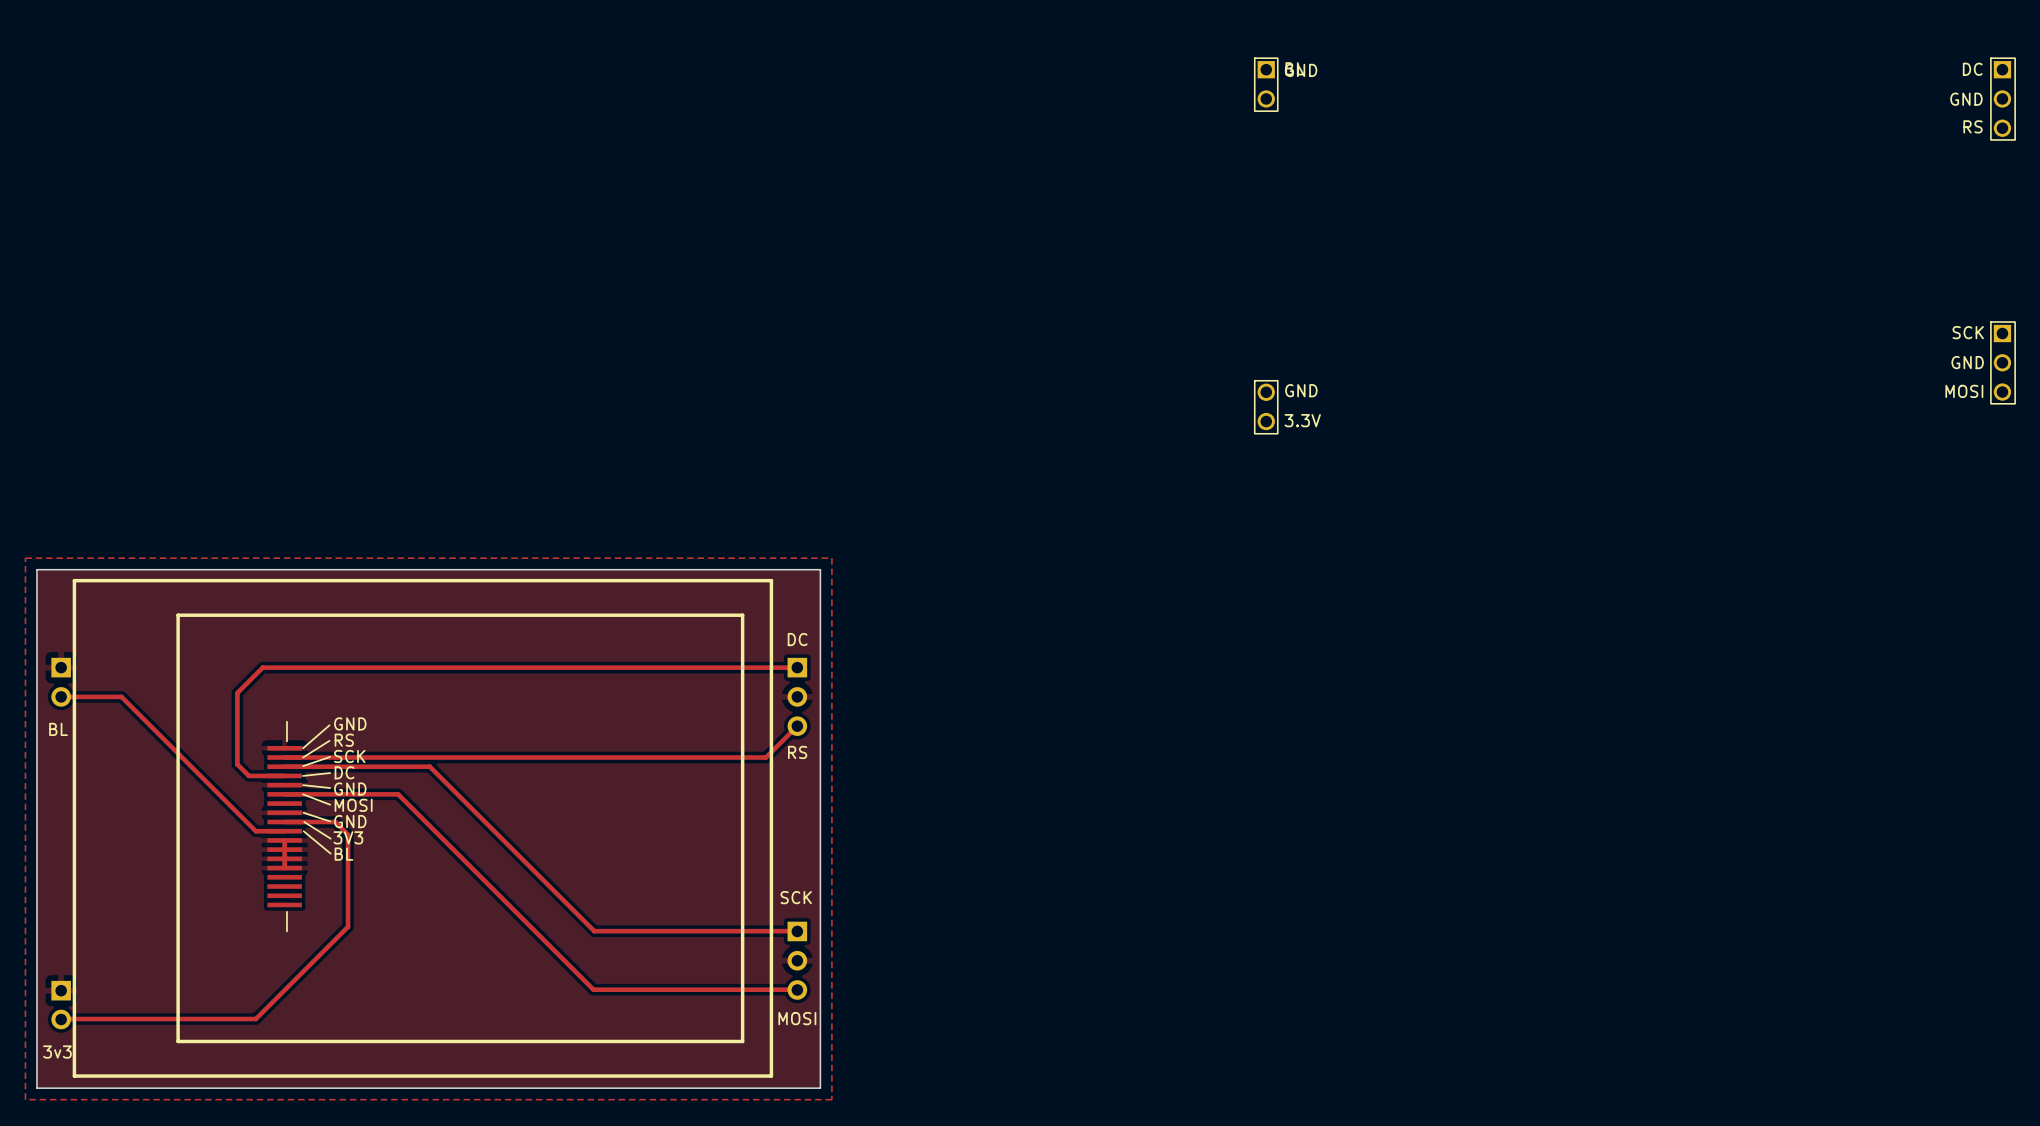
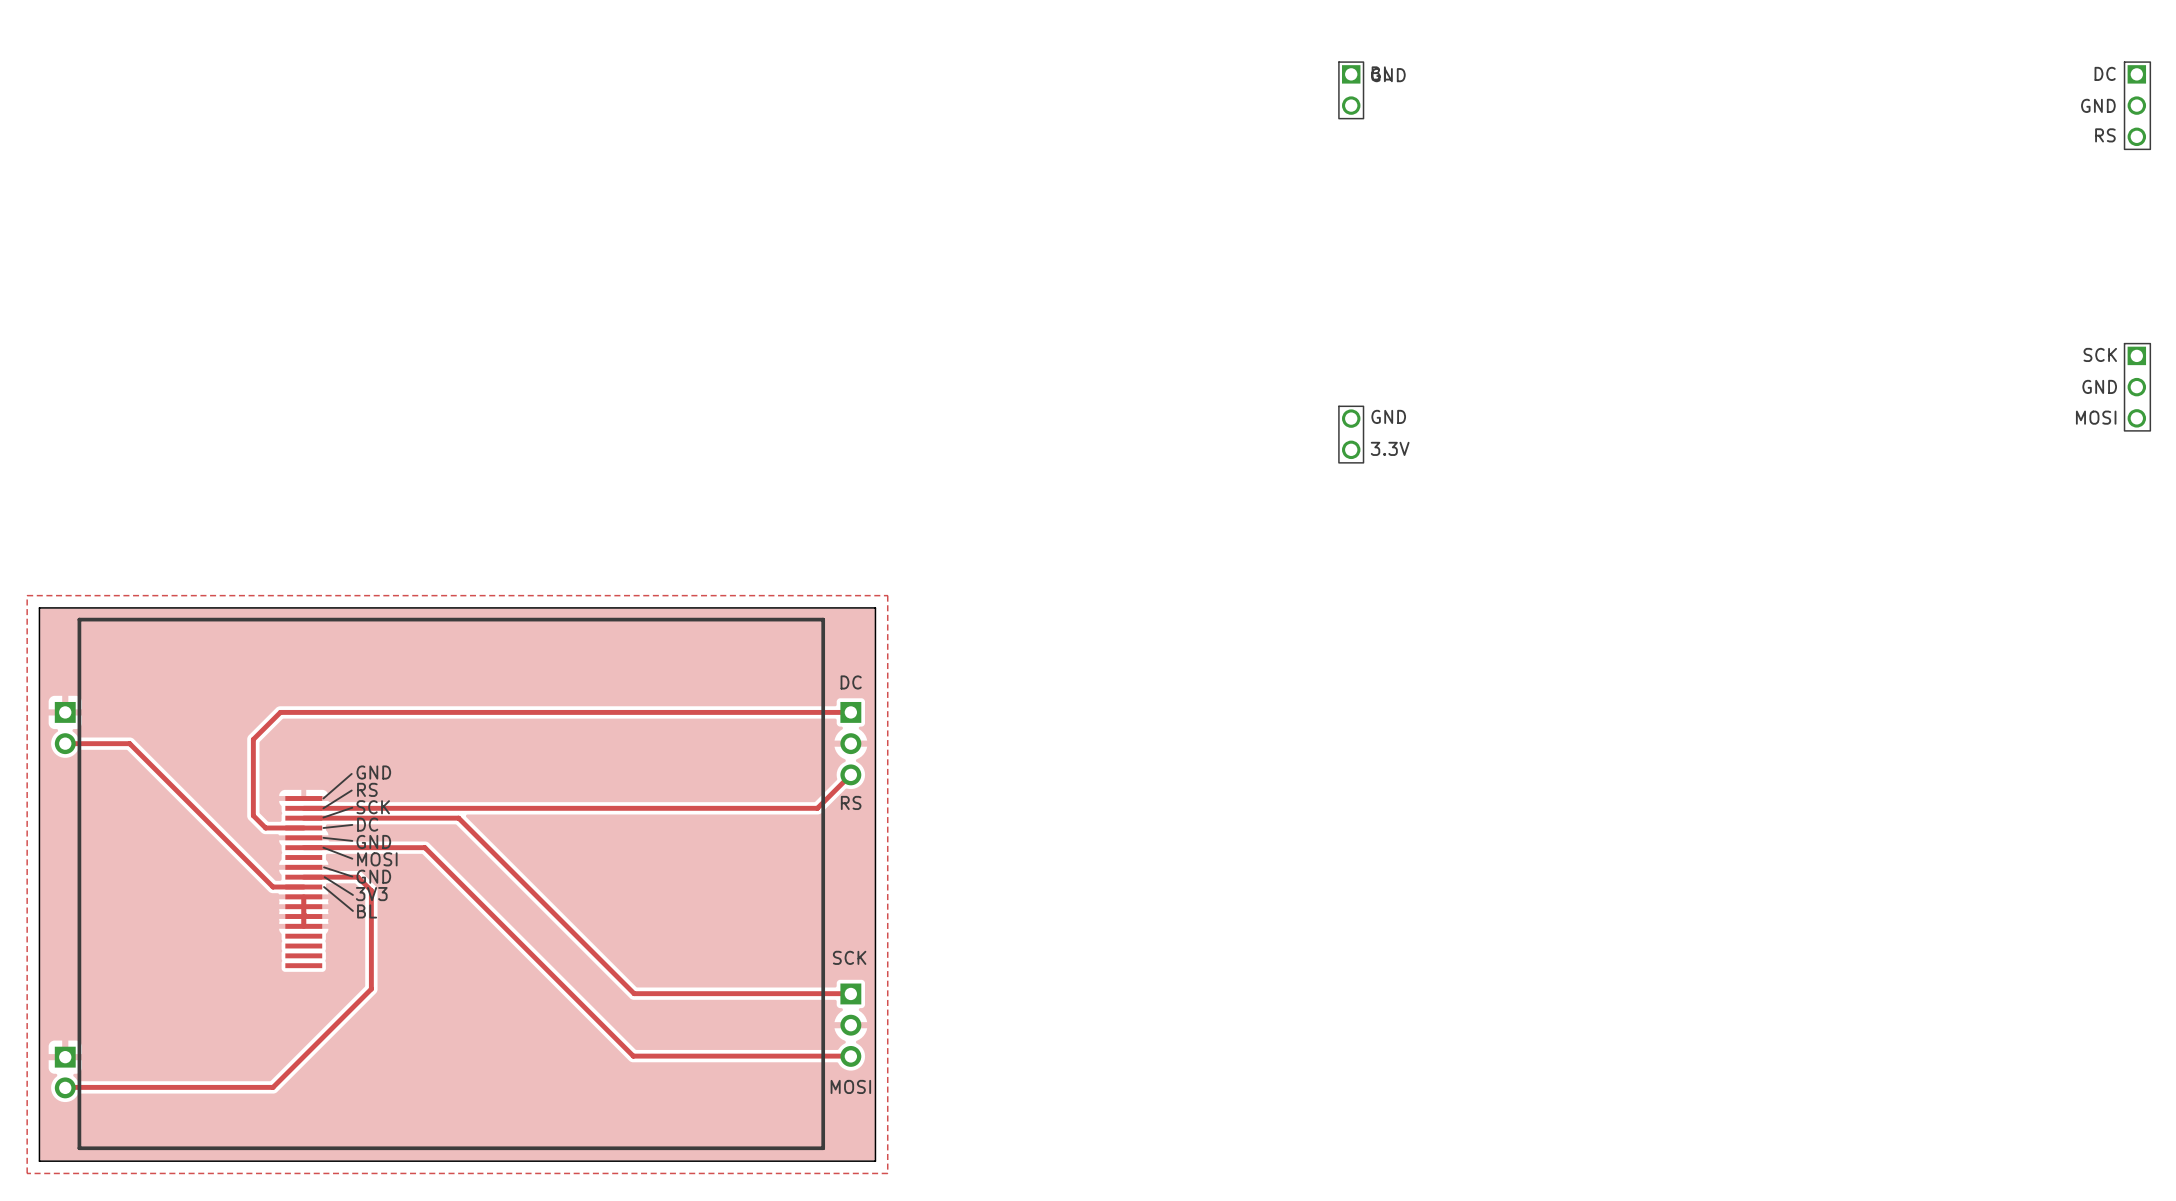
line: (178, 615) (742, 615) (742, 1041) (178, 1041) (178, 615) -> none
line: (286, 721) (286, 741) -> none
text: BL (58, 729) -> none
line: (286, 911) (286, 931) -> none
text: 3v3 (57, 1052) -> none

